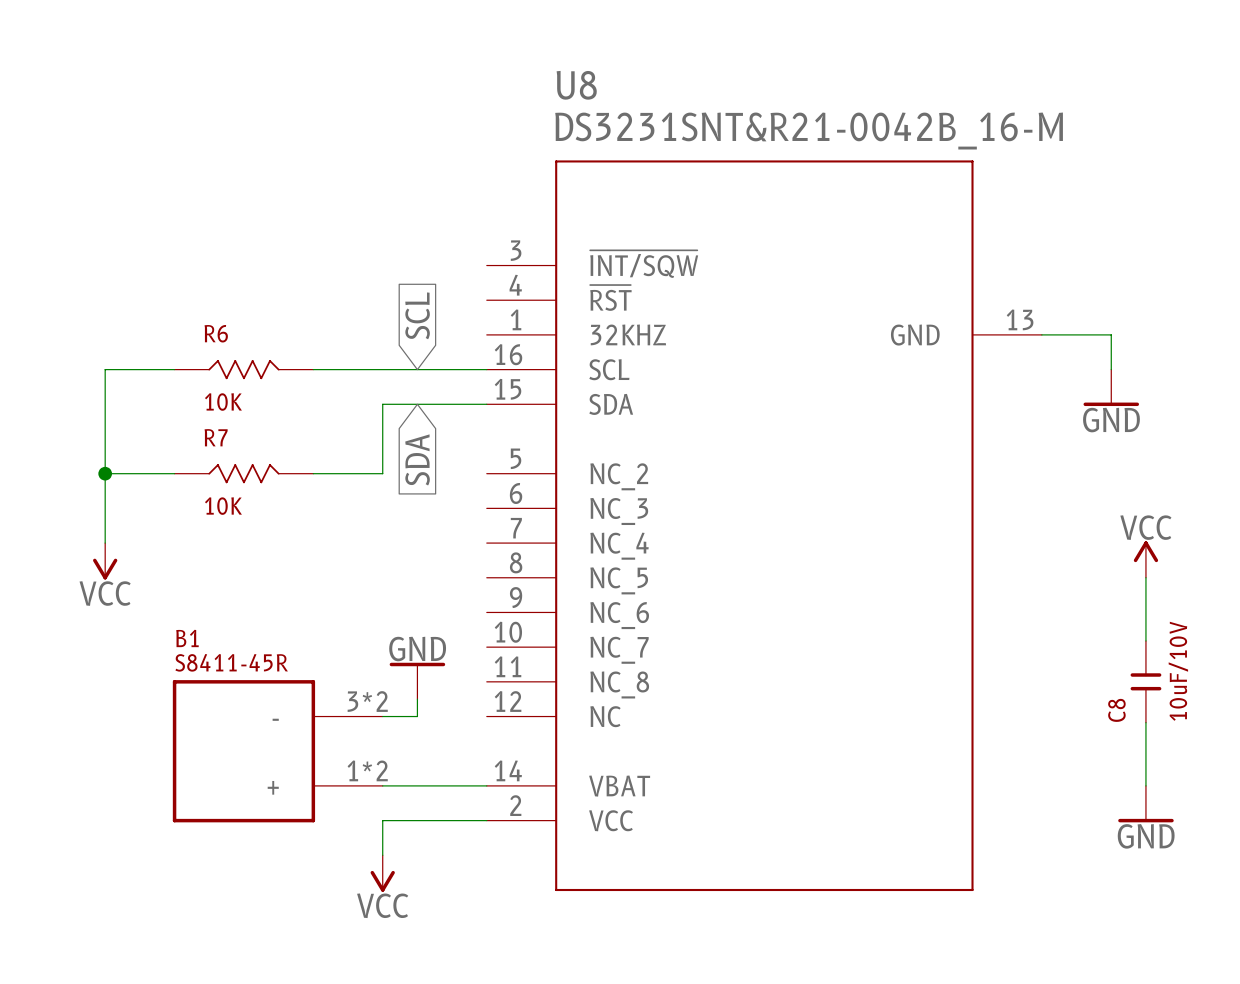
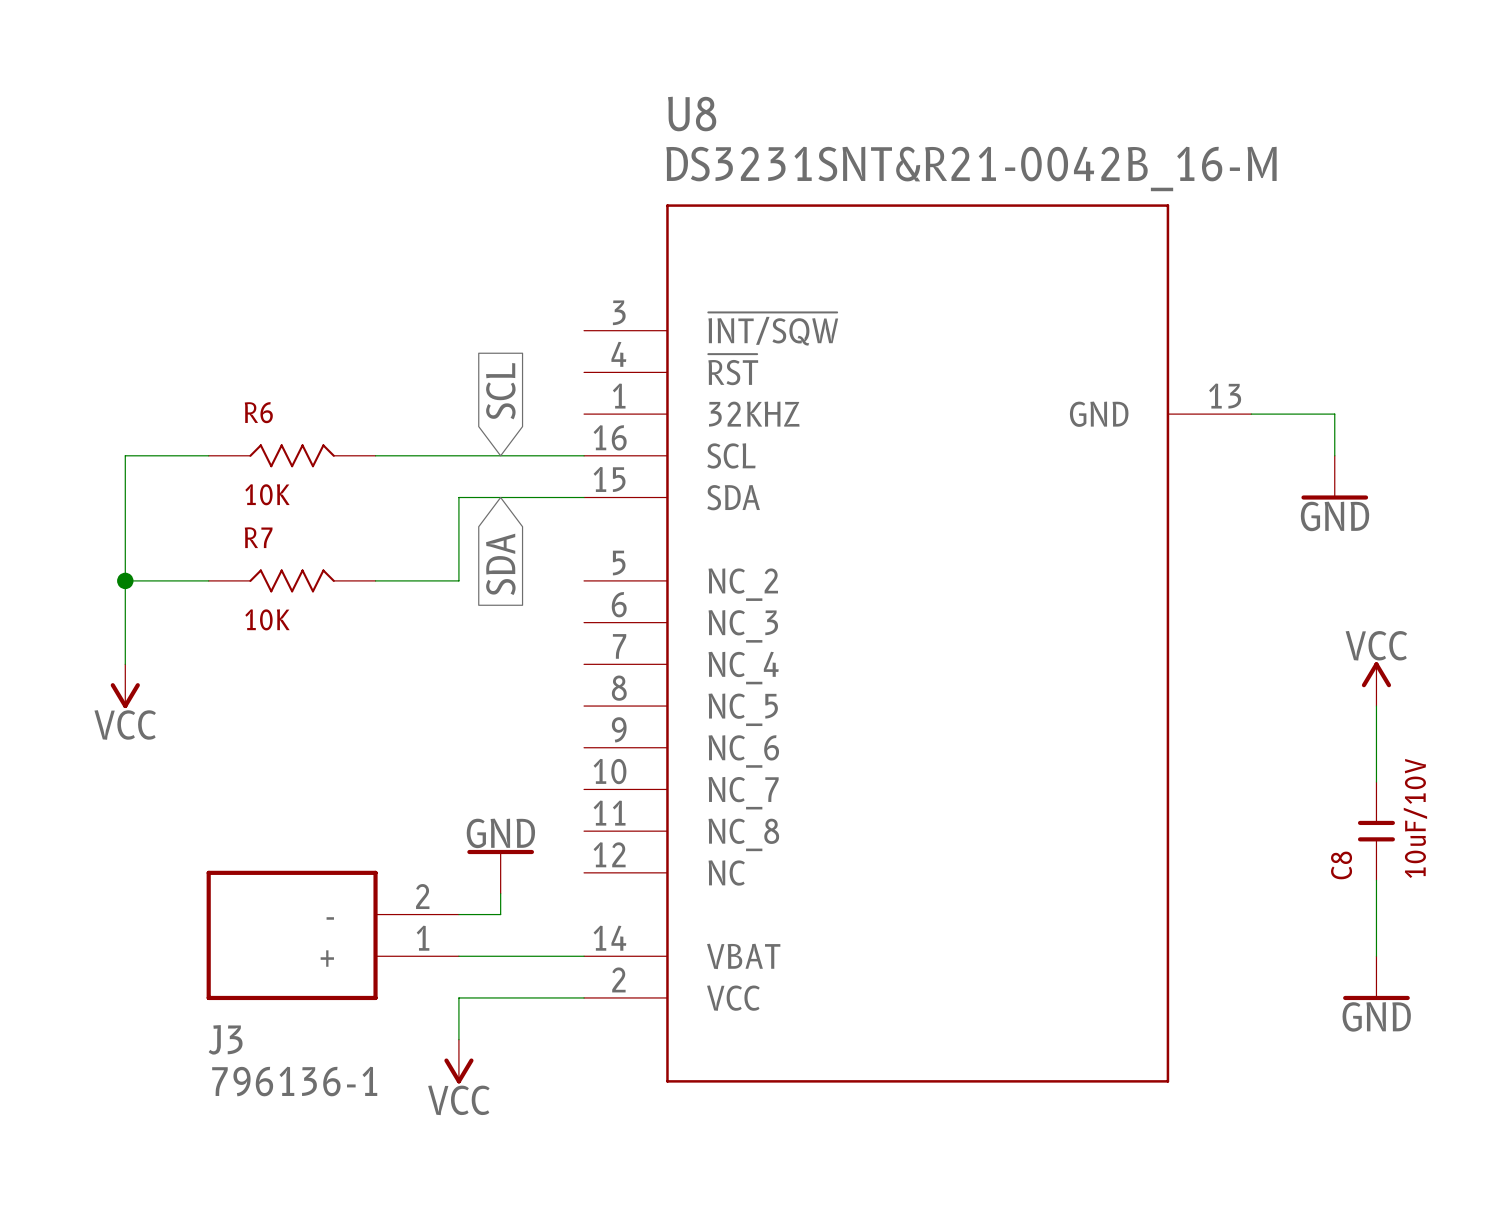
power symbol position: GND (417, 680) -> GND (500, 871)
wire: (417, 699) (417, 716) (382, 716) -> (500, 893) (500, 914) (458, 914)
B1: S8411-45R (277, 751) -> none
J3: none -> 796136-1 (332, 935)

